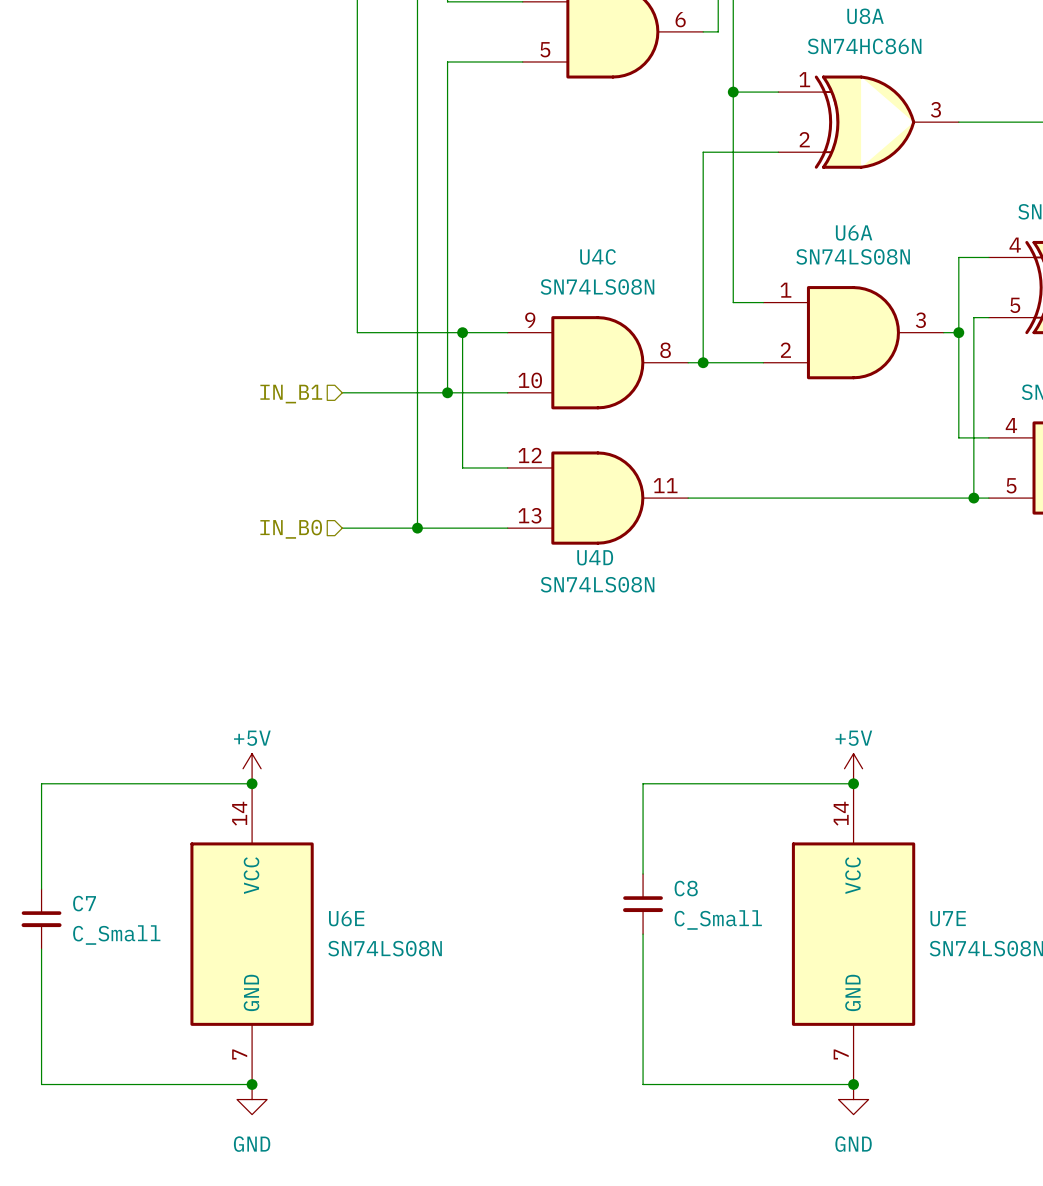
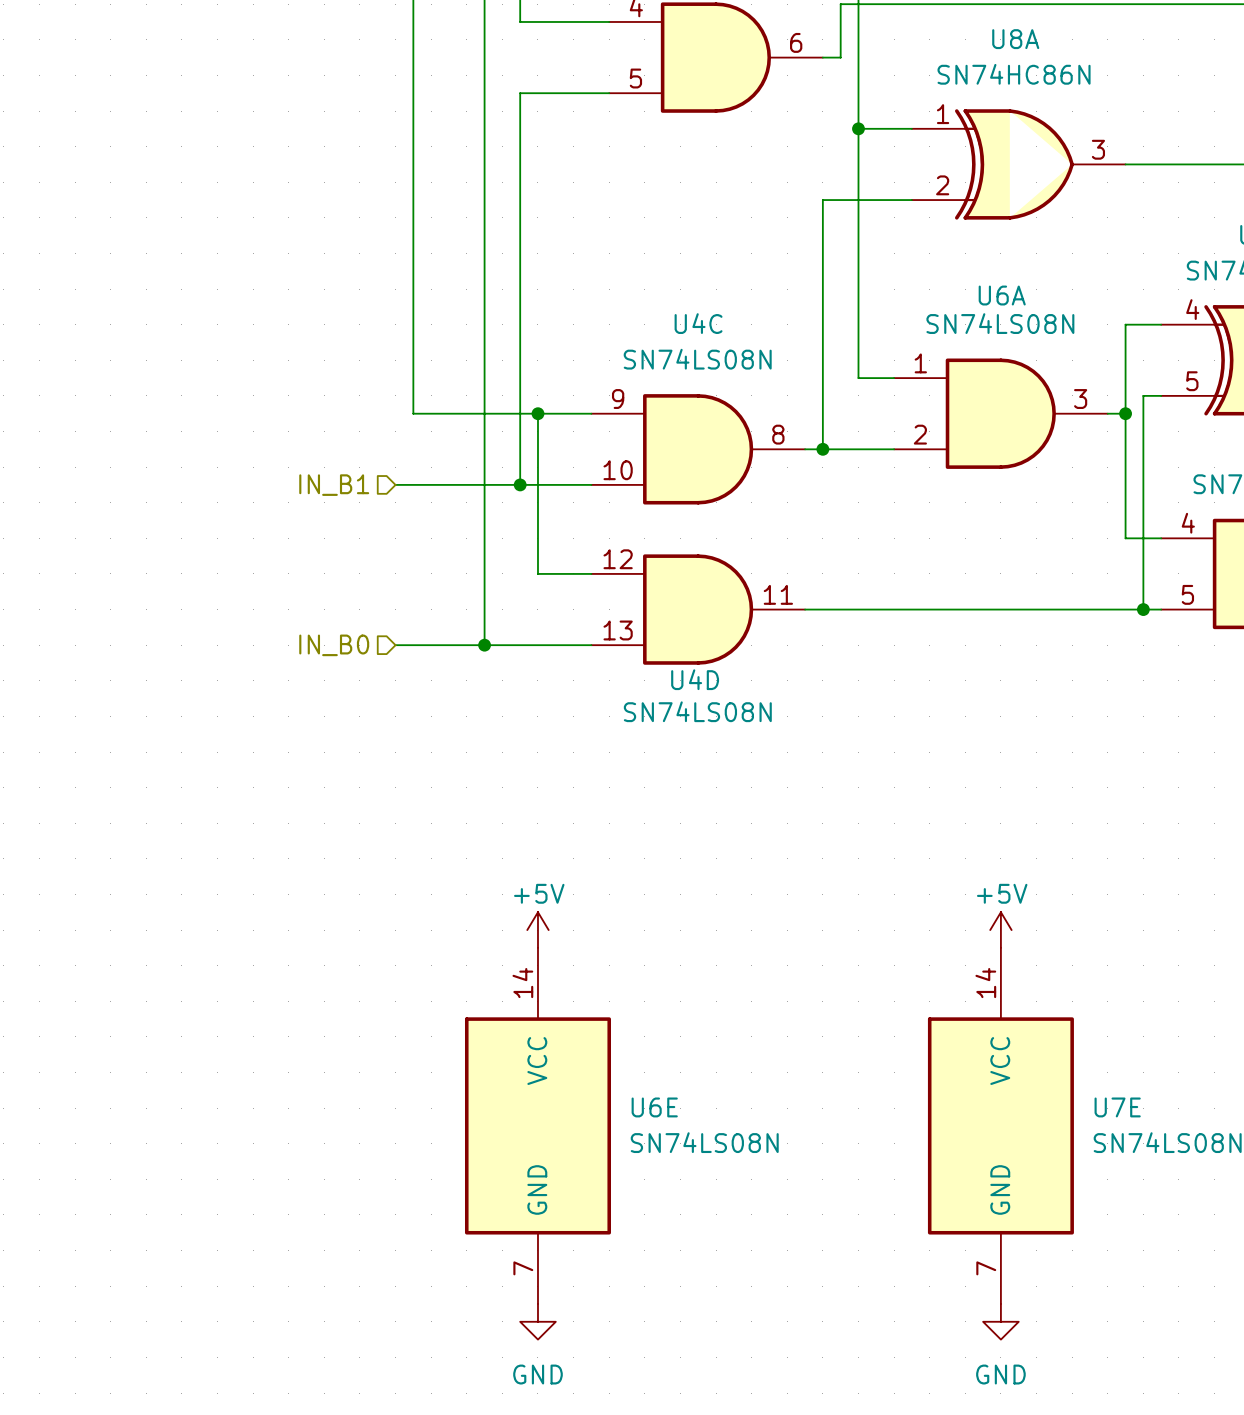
power symbol position: +5V (252, 768) -> +5V (537, 930)
wire: (252, 783) (41, 783) (41, 889) -> none
junction: (252, 783) -> none
wire: (853, 783) (643, 783) (643, 874) -> none
junction: (853, 783) -> none
C8: C_Small (643, 904) -> none
C7: C_Small (41, 919) -> none
U6E position: (252, 934) -> (537, 1125)
wire: (643, 934) (643, 1084) (853, 1084) -> none
wire: (41, 949) (41, 1084) (252, 1084) -> none
junction: (252, 1084) -> none
junction: (853, 1084) -> none
power symbol position: GND (252, 1099) -> GND (537, 1321)

